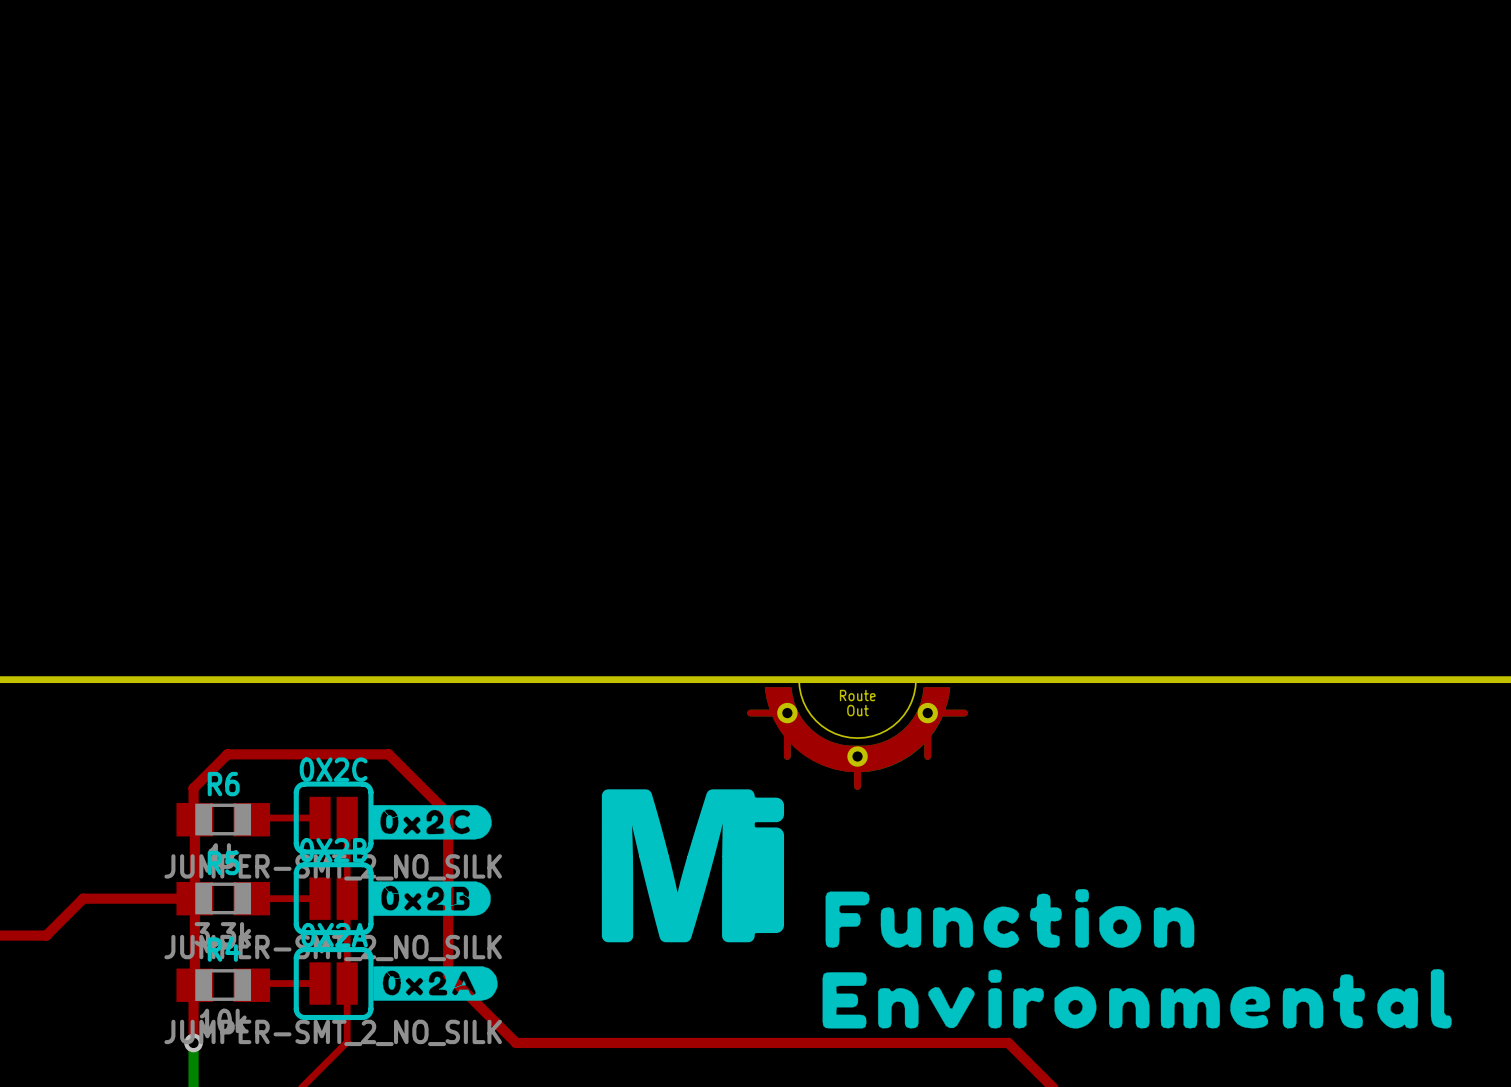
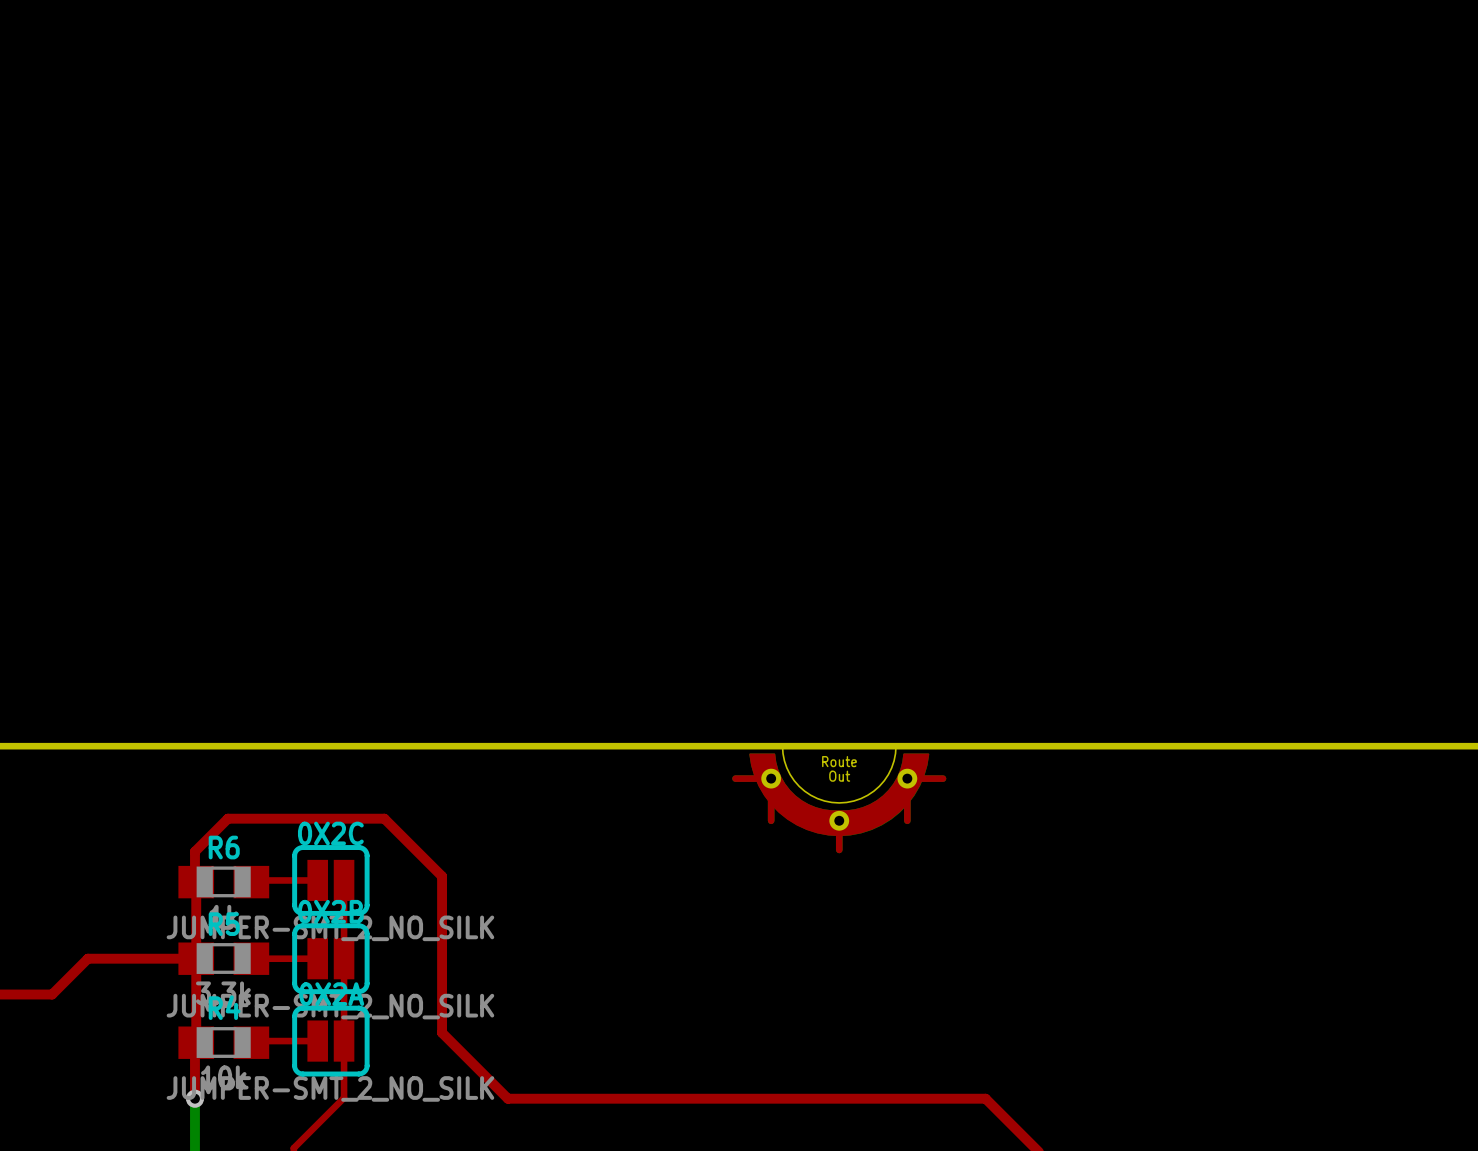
drawing: [601, 789, 785, 943] -> none
drawing: [370, 805, 492, 840] -> none
drawing: [371, 881, 491, 916] -> none
drawing: [822, 888, 1452, 1029] -> none
drawing: [373, 966, 498, 1001] -> none

